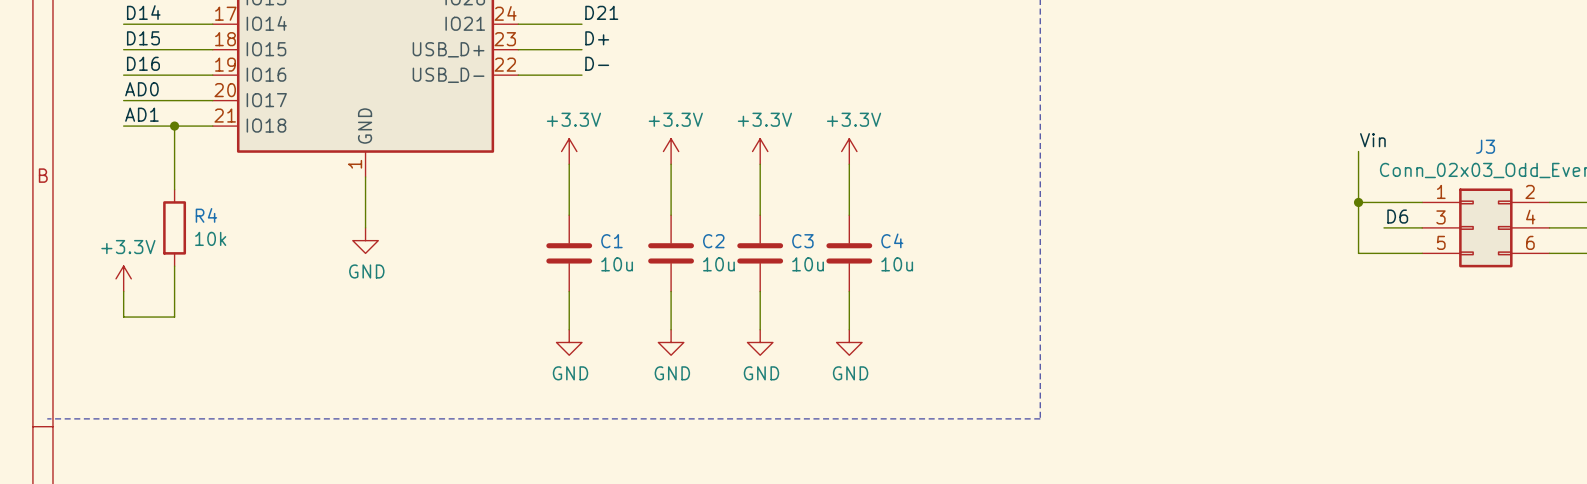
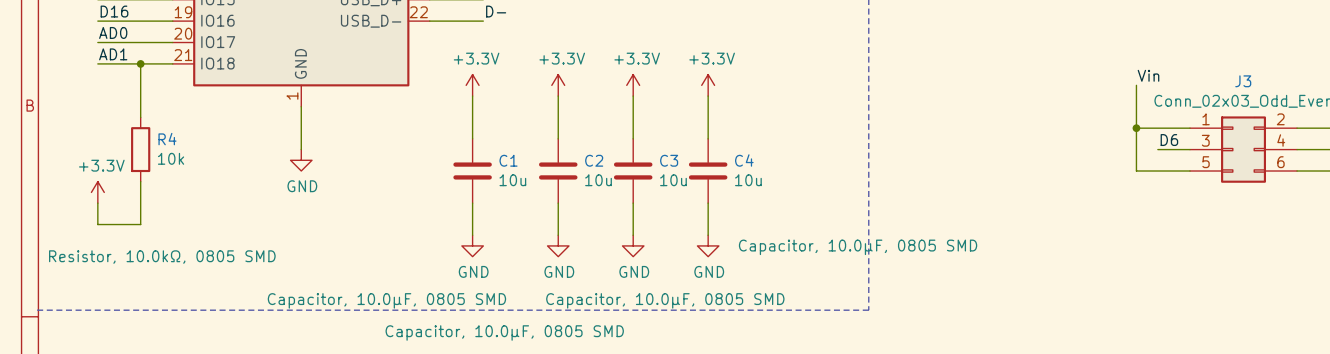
C4 text: none -> Capacitor, 10.0µF, 0805 SMD (858, 247)
R4 text: none -> Resistor, 10.0kΩ, 0805 SMD (162, 257)
C1 text: none -> Capacitor, 10.0µF, 0805 SMD (386, 300)
C3 text: none -> Capacitor, 10.0µF, 0805 SMD (665, 300)
C2 text: none -> Capacitor, 10.0µF, 0805 SMD (504, 332)

